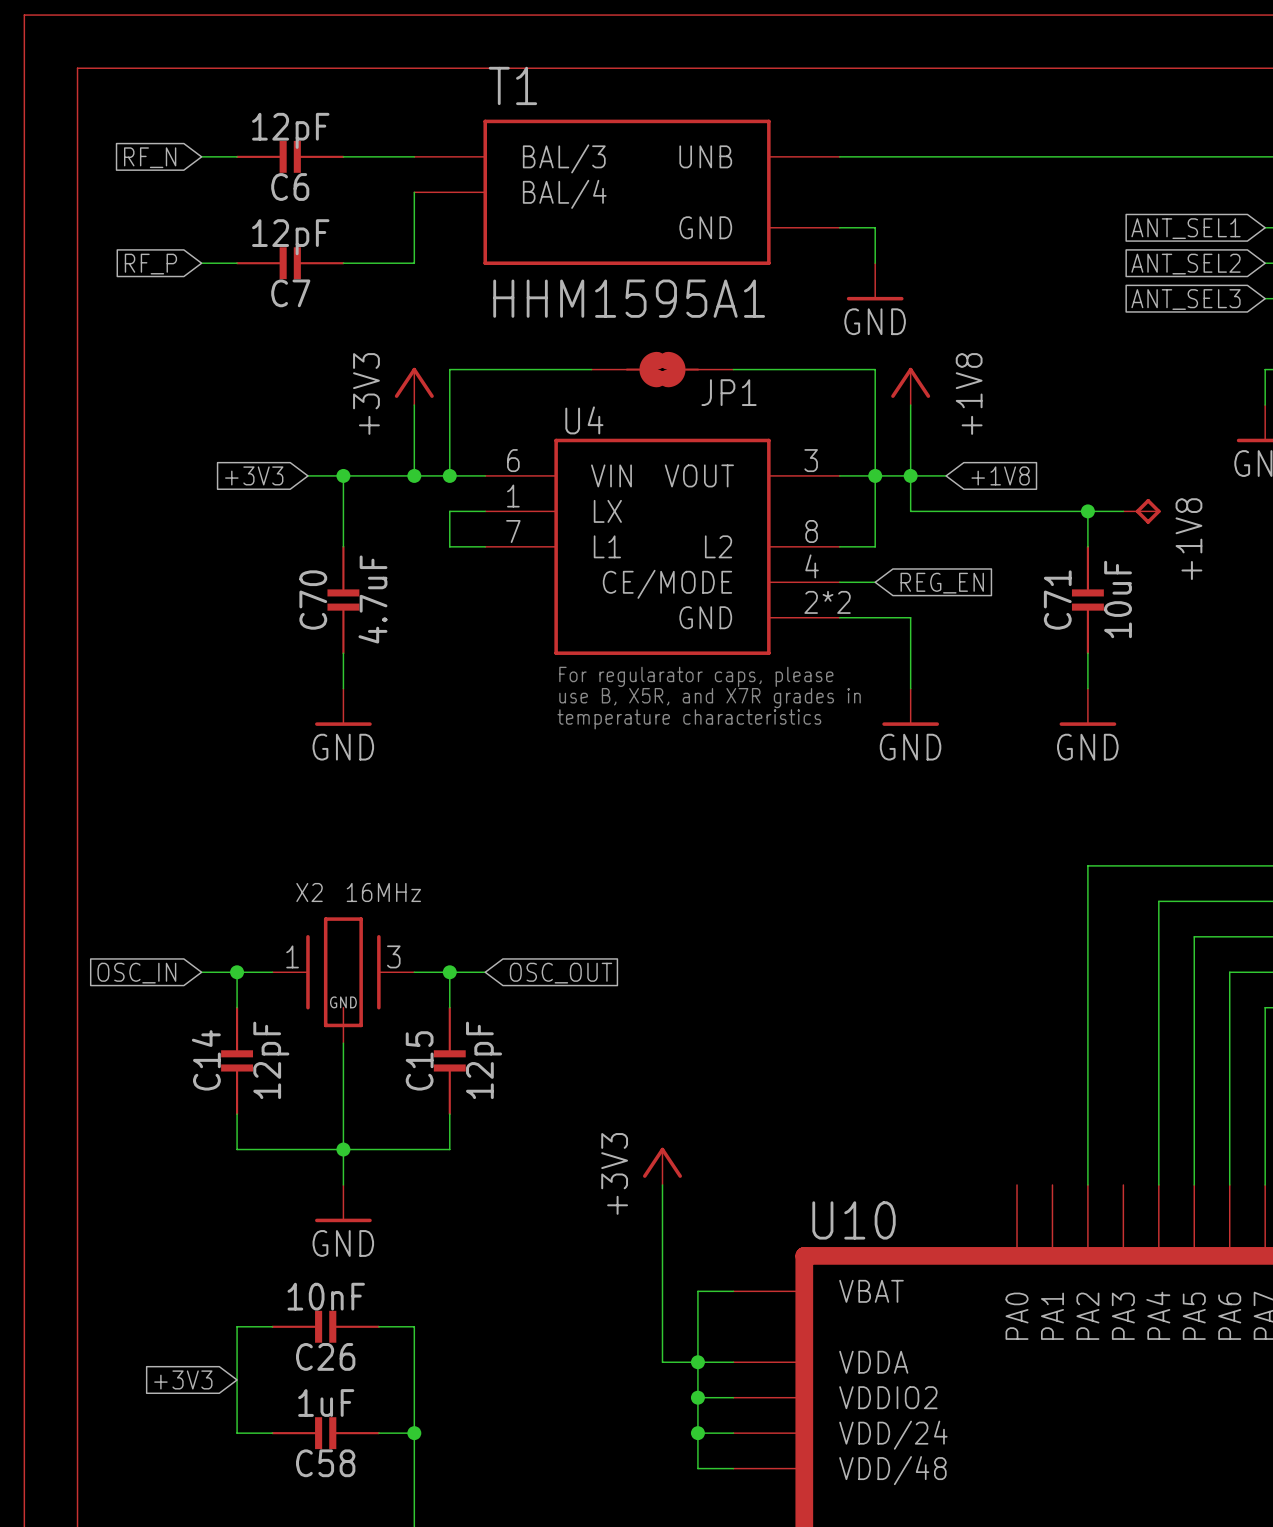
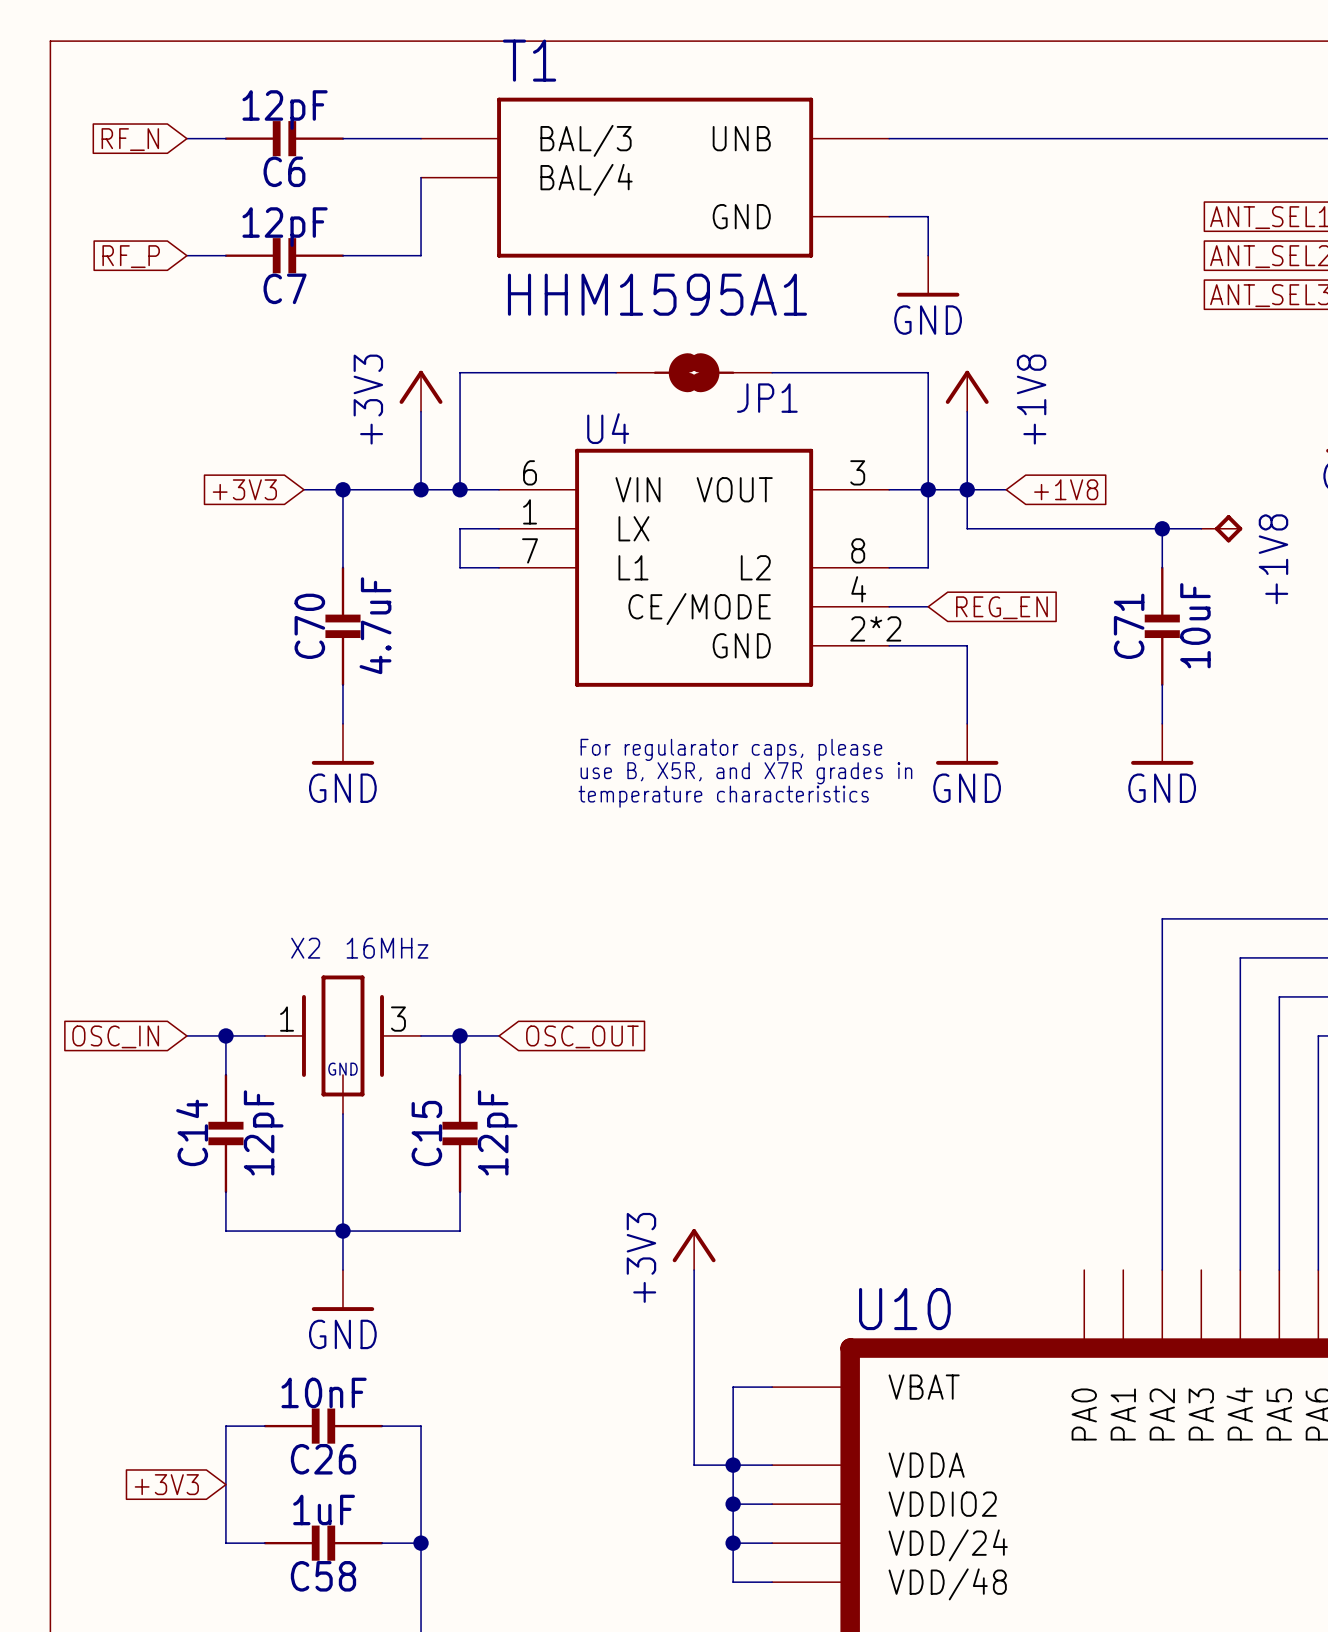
text position: For regularator caps, please (696, 676) -> For regularator caps, please (731, 749)
text position: use B, X5R, and X7R grades in (710, 698) -> use B, X5R, and X7R grades in (746, 773)
text position: temperature characteristics (689, 719) -> temperature characteristics (723, 796)

